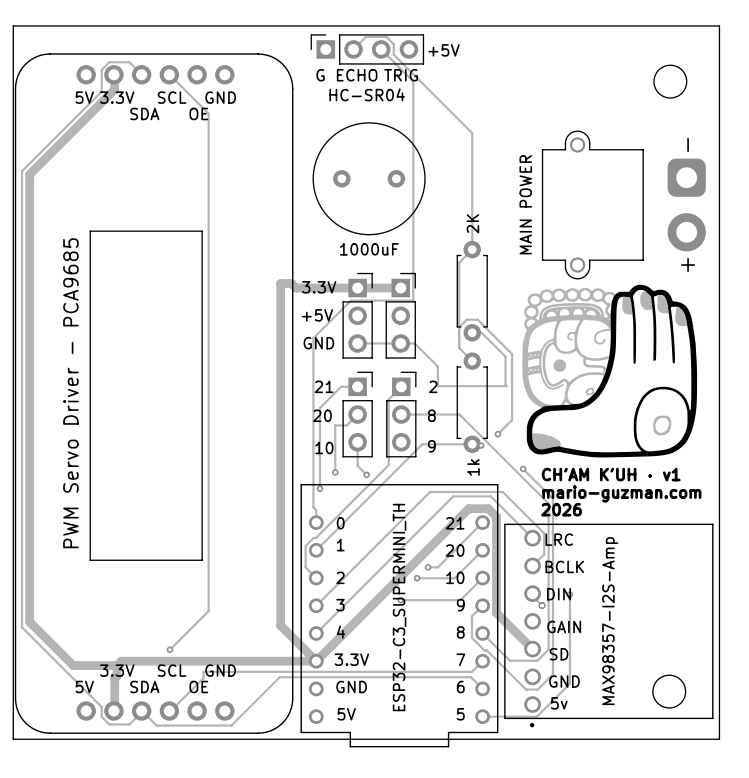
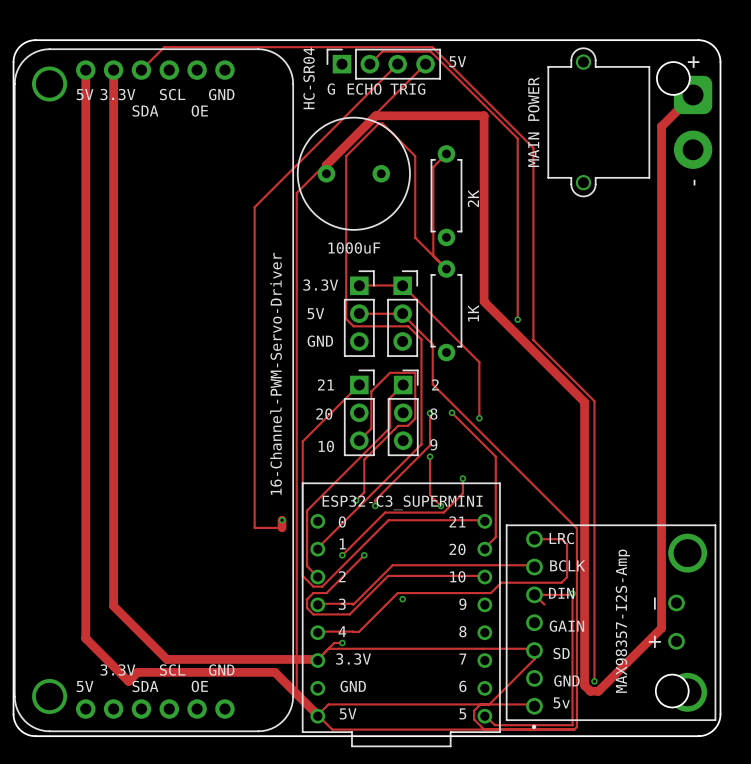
track: (353, 49) (366, 36) (386, 36) (393, 44) (393, 54) (472, 133) (472, 249) (459, 262) (459, 348) (472, 361) -> none
part: HC-SR04 (367, 49) -> none
track: (381, 49) (413, 81) (413, 158) -> (317, 548) (421, 444) (421, 339) (408, 326) (353, 326) (346, 318) (346, 156) (378, 123) (382, 123) (415, 156)
text: +5V (444, 50) -> 5V (457, 61)
board edge: (13, 65) (13, 25) (719, 25) (719, 739) (13, 739) (13, 714) -> (13, 62) (15, 52) (19, 46) (25, 42) (35, 40) (698, 40) (705, 41) (714, 46) (719, 54) (720, 62) (720, 714) (719, 721) (714, 729) (708, 733) (698, 736) (35, 736) (28, 734) (19, 729) (14, 721) (13, 714)
track: none -> (369, 64) (382, 51) (430, 51) (517, 138) (517, 319)
HC-SR04: none -> (383, 64)
track: none -> (425, 64) (296, 192) (296, 694)
track: none -> (85, 70) (85, 638) (128, 681) (137, 672) (275, 672) (317, 715)
track: none -> (113, 70) (113, 606) (166, 659) (317, 659) (334, 643) (342, 643)
track: none -> (141, 70) (164, 47) (432, 47) (533, 148) (533, 340) (594, 401) (594, 681)
track: (114, 75) (114, 89) (29, 174) (29, 621) (73, 665) (116, 665) -> none
track: (142, 75) (129, 62) (109, 62) (101, 69) (101, 91) (22, 171) (22, 627) (101, 707) (101, 716) (109, 724) (129, 724) (142, 711) (156, 725) (231, 725) (279, 677) (470, 677) (482, 688) -> none
track: (170, 75) (208, 113) (208, 611) (169, 650) -> none
text position: G (320, 75) -> G (331, 89)
text position: ECHO (357, 75) -> ECHO (364, 89)
text position: TRIG (401, 75) -> TRIG (407, 89)
track: none -> (693, 94) (661, 126) (661, 628) (598, 691) (590, 691) (584, 685) (584, 402) (484, 301) (484, 115) (375, 115) (326, 165) (326, 173)
MAIN POWER: none -> (629, 122)
track: none -> (446, 153) (433, 167) (433, 255)
1000uF: none -> (353, 173)
part: 1000uF (369, 178) -> none
2K: none -> (446, 195)
part: MAIN POWER (623, 204) -> none
board edge: (90, 231) (202, 231) (202, 560) (90, 560) (90, 231) -> none
track: (413, 240) (413, 300) (350, 300) (313, 338) (313, 507) (316, 510) (316, 522) (313, 519) -> (415, 237) (446, 269)
drawing: [522, 284, 698, 458] -> none
track: none -> (358, 285) (402, 285) (479, 362) (479, 418)
track: (400, 288) (296, 288) (291, 283) (280, 283) (280, 521) -> none
part: 2K (472, 291) -> none
1K: none -> (446, 310)
5V name: none -> 5V (315, 313)
text: +5V (317, 315) -> none
track: none -> (358, 313) (401, 313) (432, 344) (432, 384) (576, 528) (576, 727) (574, 729) (332, 729) (317, 715)
via: none -> (517, 319)
track: (459, 327) (466, 319) (477, 319) (512, 354) (512, 420) (497, 434) -> none
track: (472, 332) (481, 332) (505, 356) (506, 386) (437, 386) (437, 366) (414, 343) (357, 343) -> none
track: (357, 386) (341, 386) (319, 407) (319, 488) -> none
track: (401, 386) (388, 399) (388, 465) (305, 545) -> (402, 385) (390, 398) (390, 427) (307, 510) (307, 544)
track: none -> (358, 385) (302, 441) (302, 575) (313, 586) (322, 586) (388, 520) (484, 520) (484, 516)
16-Channel-PWM-Servo-Driver: none -> (153, 390)
part: (154, 393) -> none
part: 1k (472, 402) -> none
track: (357, 414) (346, 425) (335, 425) (335, 472) -> none
track: (401, 414) (459, 414) (548, 503) (548, 649) (537, 660) (509, 660) (482, 633) -> none
track: none -> (430, 412) (430, 445) (375, 500) (375, 505)
via: none -> (430, 413)
track: none -> (451, 412) (495, 456) (495, 537) (484, 548)
via: none -> (451, 412)
via: none -> (479, 418)
via: (497, 434) -> none
track: (357, 442) (357, 465) (366, 474) -> none
track: none -> (358, 441) (371, 428) (371, 391) (390, 372) (415, 372) (415, 418) (407, 425) (398, 425) (364, 459) (364, 492) (356, 500)
track: (472, 444) (422, 444) (316, 550) -> none
via: (481, 445) -> none
track: none -> (430, 456) (430, 495) (440, 505)
via: none -> (430, 456)
track: (523, 468) (552, 498) (552, 674) (537, 689) (525, 689) (471, 637) (471, 616) (482, 605) -> none
via: (523, 468) -> none
via: (335, 472) -> none
via: (366, 474) -> none
text: CH'AM K'UH · v1 (611, 474) -> none
track: none -> (462, 478) (462, 493) (443, 512) (385, 512) (342, 555)
via: none -> (462, 478)
via: (319, 488) -> none
text: mario-guzman.com (621, 493) -> none
via: none -> (356, 500)
ESP32-C3_SUPERMINI name: none -> ESP32-C3_SUPERMINI (402, 502)
via: none -> (375, 505)
via: none -> (440, 505)
text: 2026 (561, 509) -> none
via: none -> (282, 520)
track: (482, 522) (437, 567) (428, 567) -> none
track: (280, 529) (280, 625) (316, 661) -> (282, 527) (254, 527) (254, 207) (397, 64)
track: (532, 538) (490, 496) (453, 496) (316, 633) -> none
track: none -> (534, 539) (561, 539) (567, 544) (567, 577) (561, 582) (501, 582) (490, 593) (397, 593) (358, 632) (317, 631)
track: (482, 550) (454, 578) (417, 578) -> none
via: none -> (342, 555)
track: none -> (364, 555) (326, 593) (313, 593) (307, 599) (307, 608) (313, 614) (349, 614) (388, 575) (484, 575)
via: none -> (364, 555)
track: (532, 565) (544, 554) (544, 533) (502, 492) (430, 492) (316, 605) -> none
via: (428, 567) -> none
track: none -> (534, 567) (532, 565) (392, 565) (353, 604) (317, 603)
via: (417, 578) -> none
track: (482, 578) (460, 600) (400, 600) -> none
track: none -> (572, 593) (534, 594)
via: (542, 605) -> none
ESP32-C3_SUPERMINI value: ESP32-C3_SUPERMINI_TH (399, 607) -> none
part: MAX98357-I2S-Amp (608, 625) -> none
MAX98357-I2S-Amp: none -> (611, 626)
via: none -> (342, 643)
via: (169, 649) -> none
track: none -> (328, 648) (532, 648) (534, 659) (489, 704)
track: (532, 649) (496, 613) (496, 516) (488, 508) (468, 508) (316, 661) -> none
track: (316, 661) (121, 661) (116, 665) -> none
track: (482, 661) (471, 671) (203, 671) (203, 678) (170, 711) -> none
track: (116, 665) (116, 676) (114, 678) (114, 711) -> none
via: none -> (594, 681)
track: (569, 683) (536, 716) (482, 716) -> (572, 683) (572, 725) (494, 725) (484, 715)
track: none -> (480, 704) (474, 710) (474, 719) (484, 729)
track: none -> (534, 706) (532, 704) (328, 704) (317, 715)

